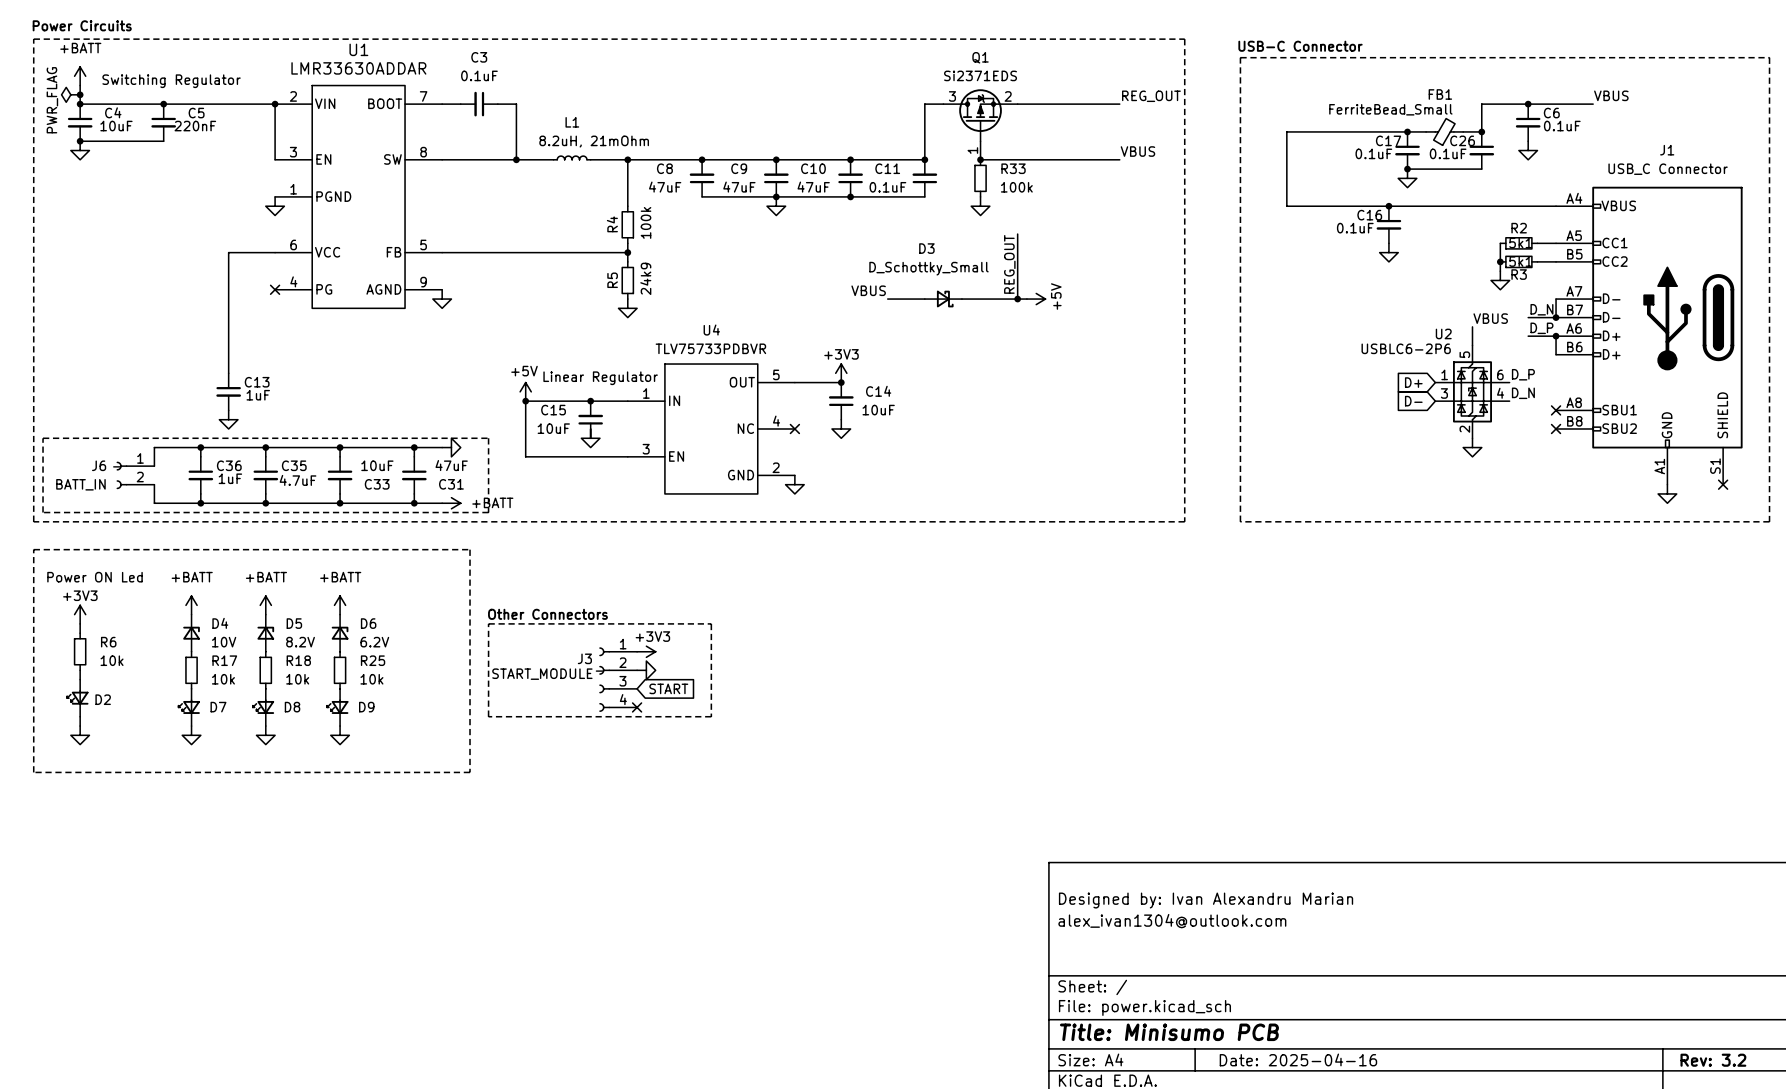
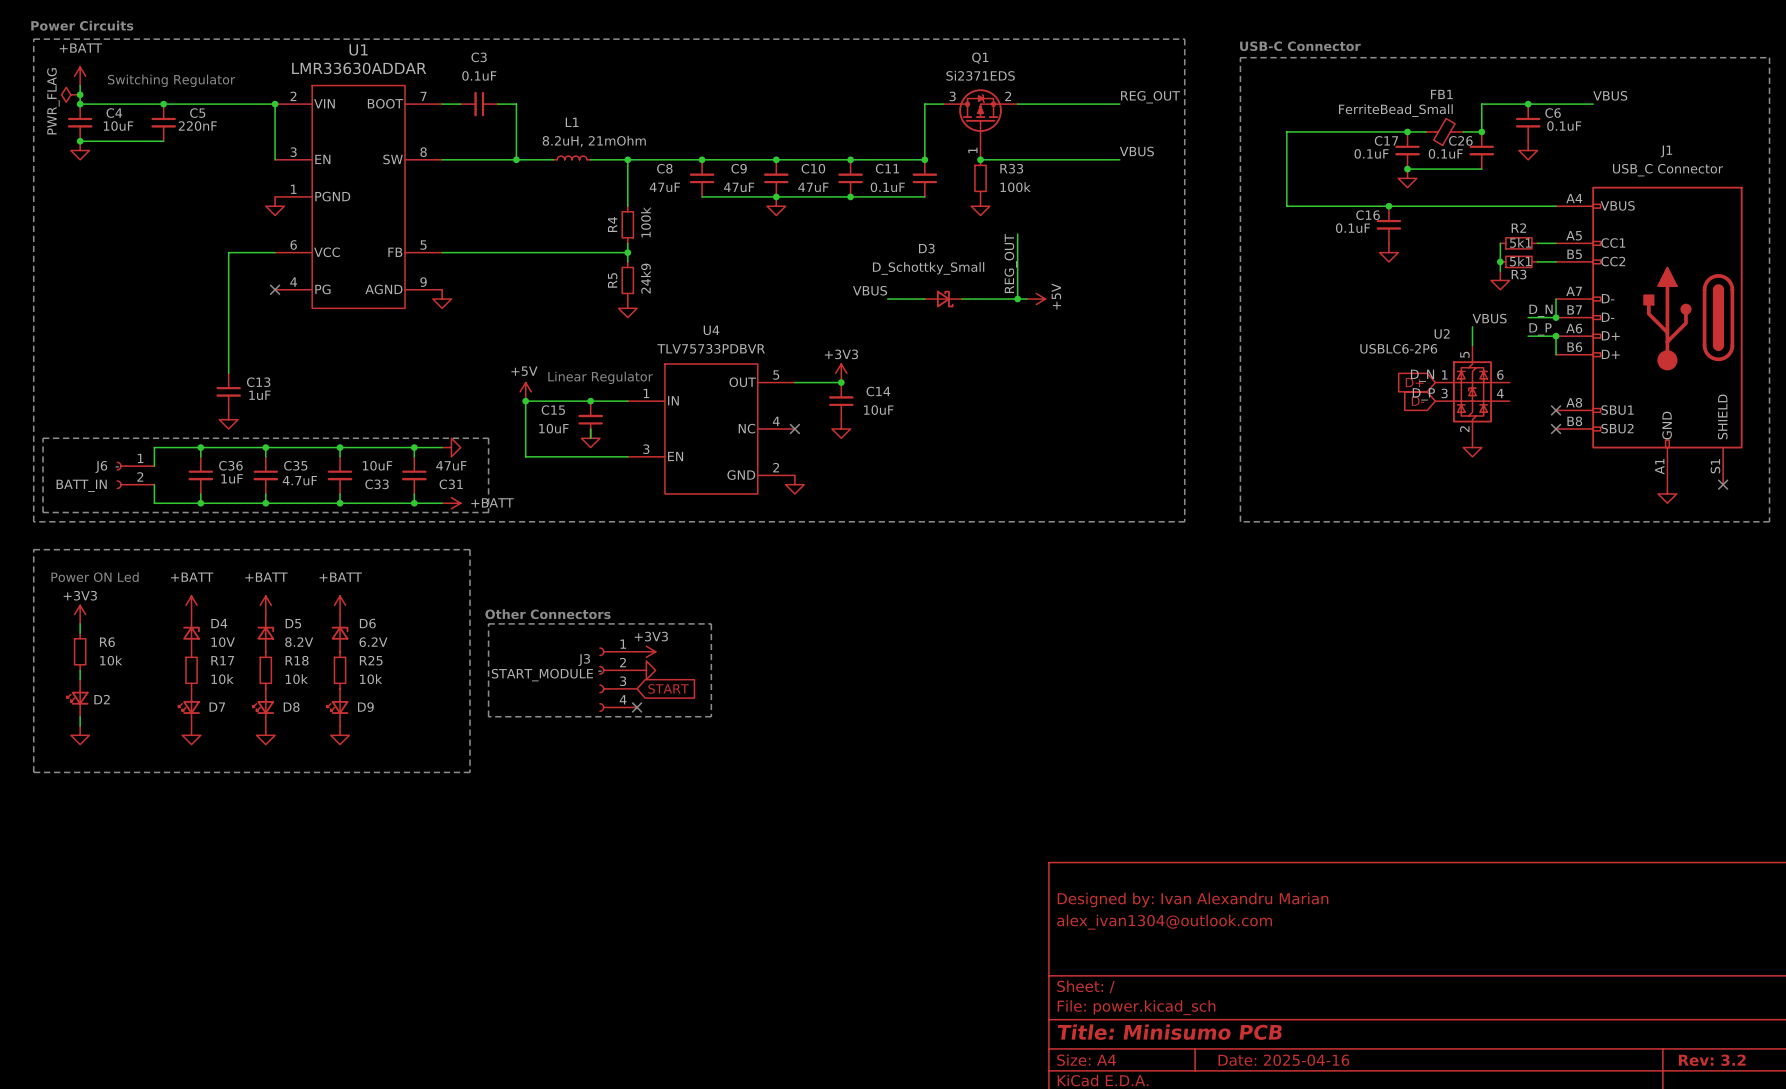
label position: D_P (1523, 374) -> D_P (1423, 394)
label position: D_N (1523, 393) -> D_N (1422, 375)

